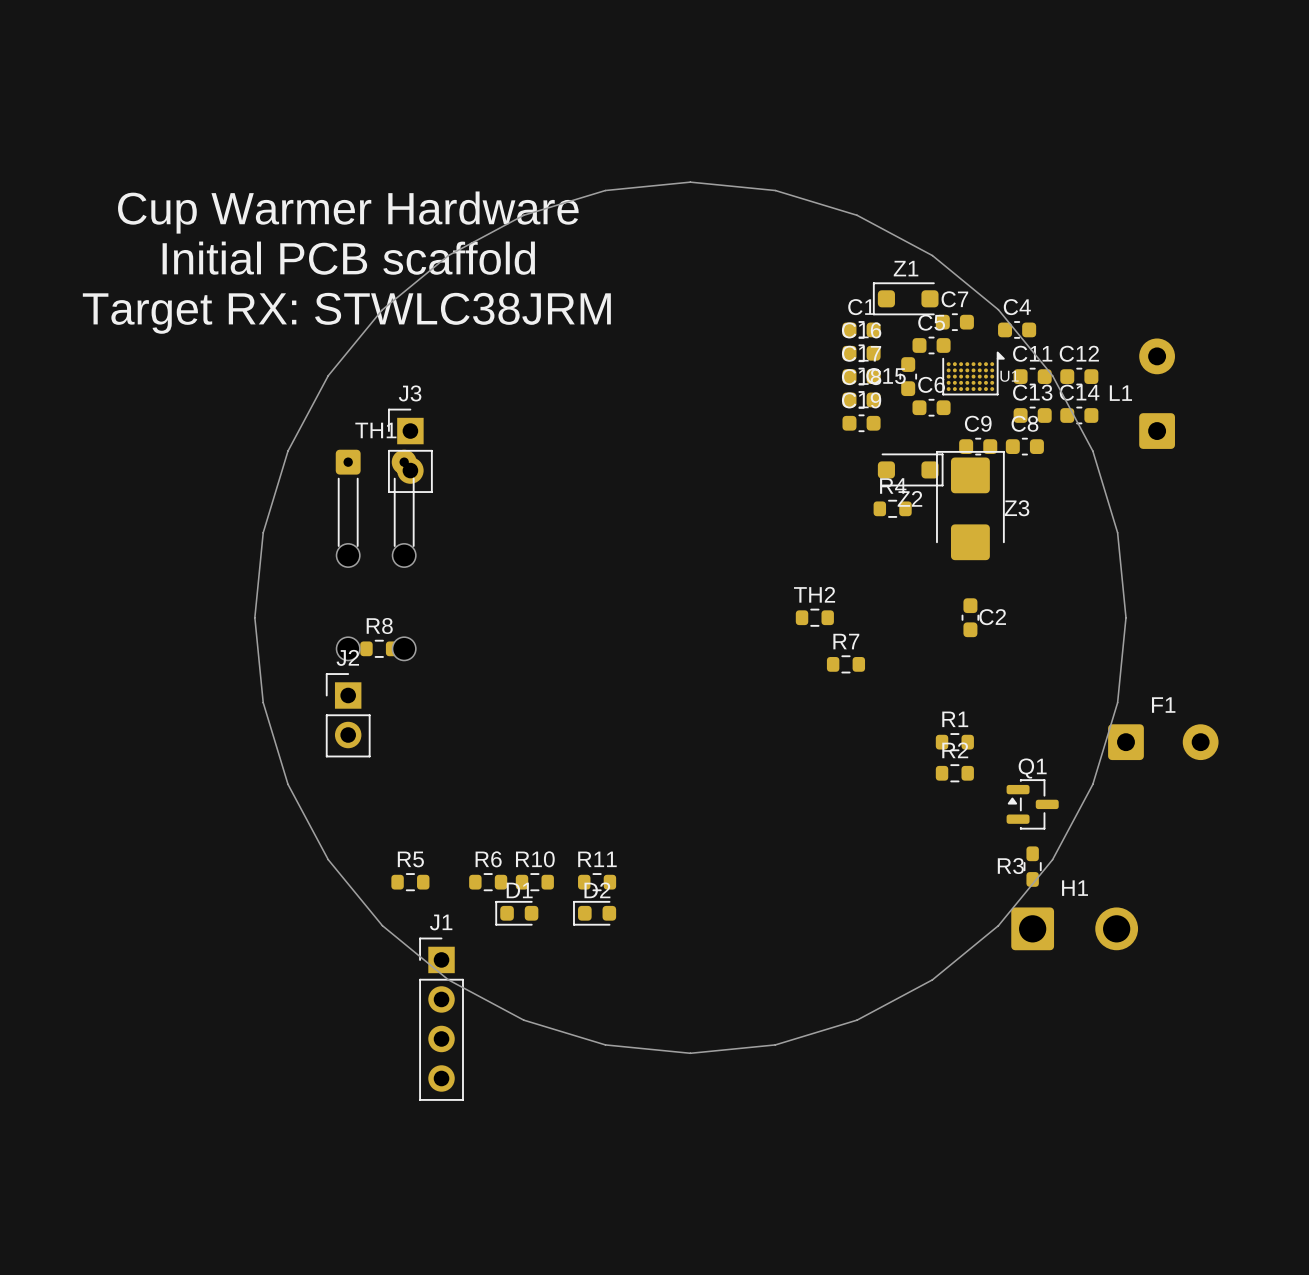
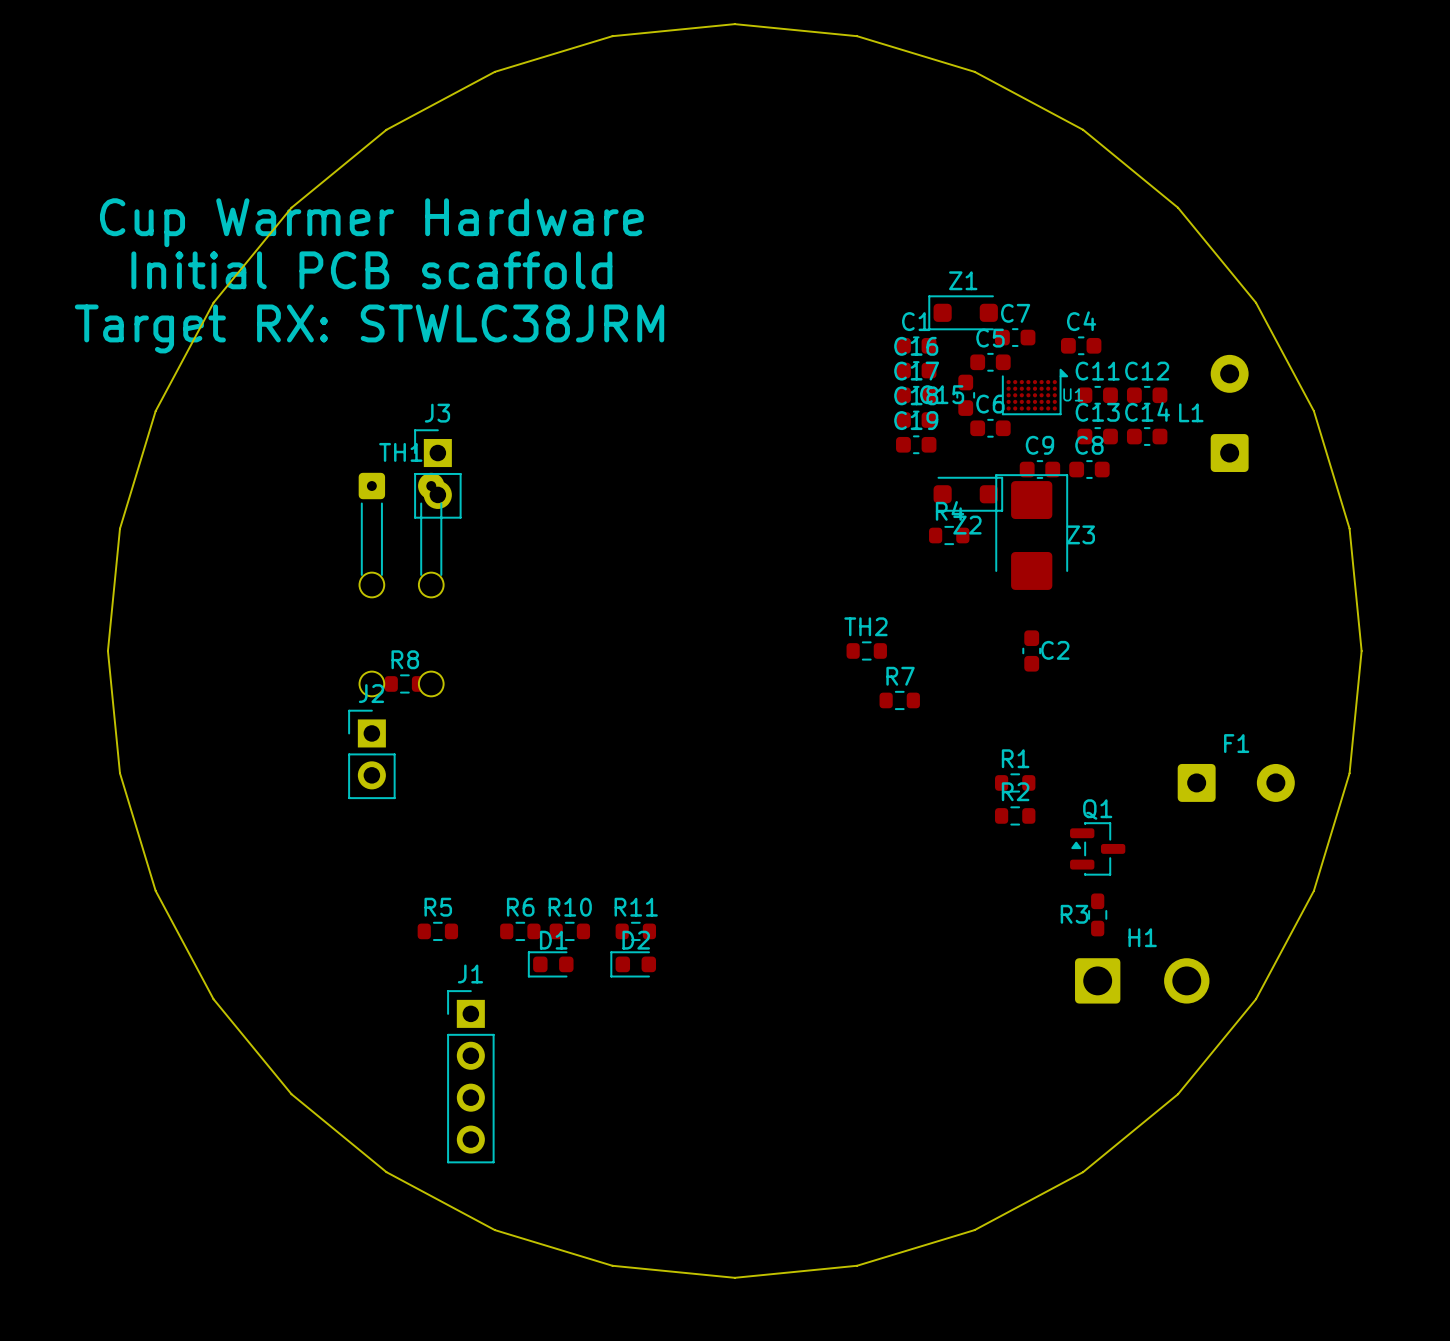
board edge: (690, 182) (605, 190) (523, 215) (448, 255) (382, 309) (328, 375) (288, 451) (263, 532) (254, 617) (263, 702) (288, 784) (328, 859) (382, 925) (448, 979) (523, 1020) (605, 1044) (690, 1053) (775, 1044) (857, 1020) (932, 979) (998, 925) (1052, 859) (1092, 784) (1117, 702) (1125, 617) (1117, 532) (1092, 451) (1052, 375) (998, 309) (932, 255) (857, 215) (775, 190) (690, 182) -> (734, 24) (612, 36) (494, 71) (386, 129) (291, 207) (213, 302) (155, 411) (119, 528) (107, 650) (119, 773) (155, 890) (213, 999) (291, 1094) (386, 1172) (494, 1230) (612, 1265) (734, 1277) (857, 1265) (974, 1230) (1083, 1172) (1178, 1094) (1255, 999) (1313, 890) (1349, 773) (1361, 650) (1349, 528) (1313, 411) (1255, 302) (1178, 207) (1083, 129) (974, 71) (857, 36) (734, 24)

